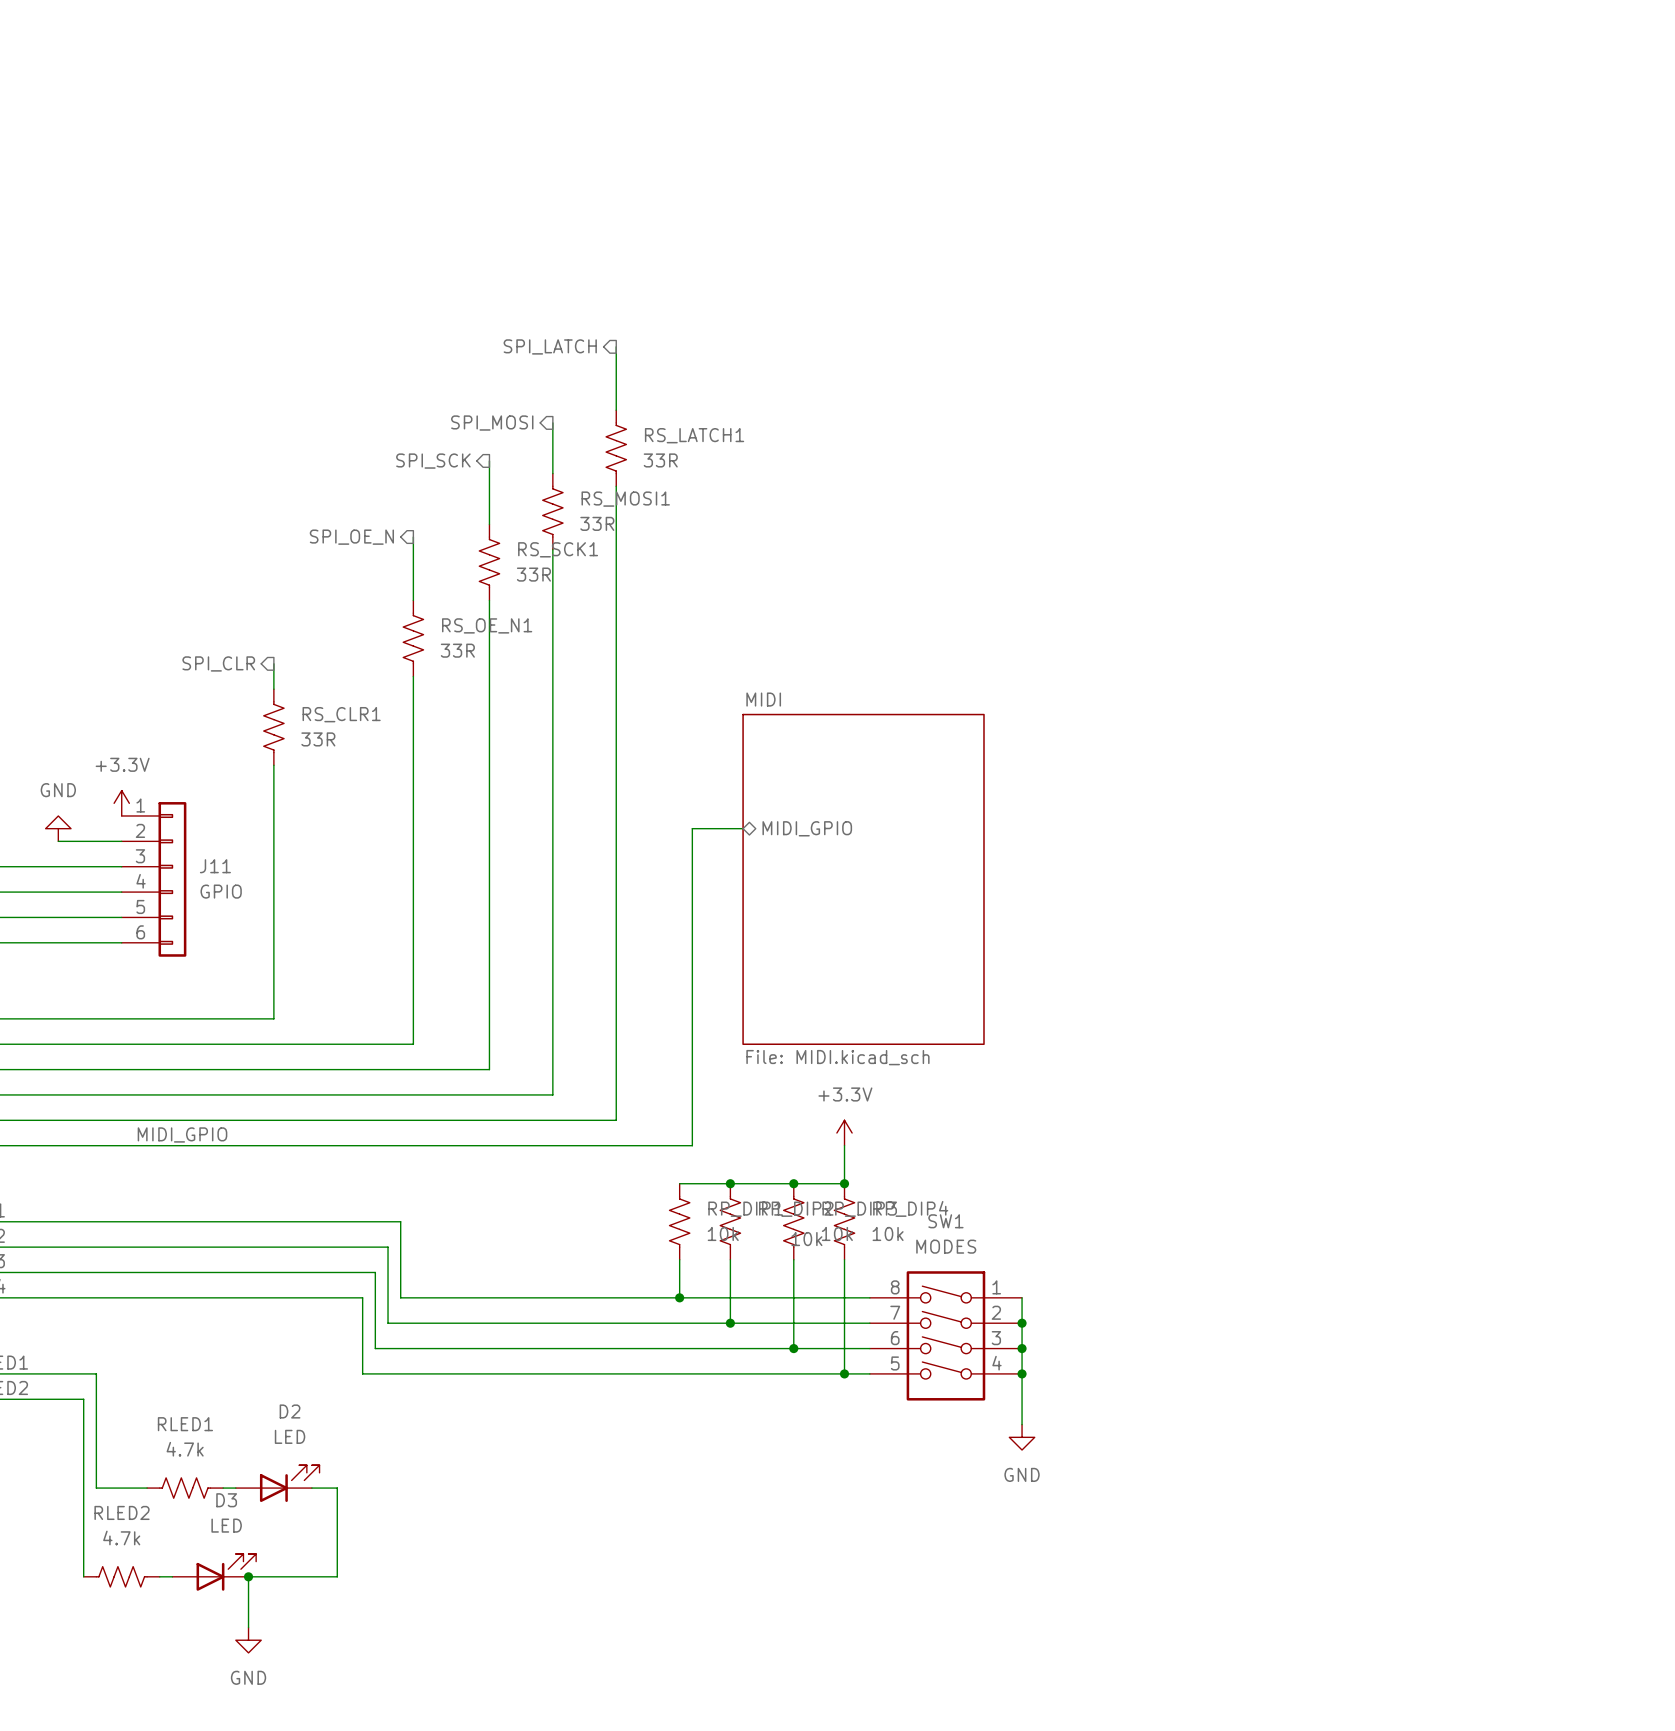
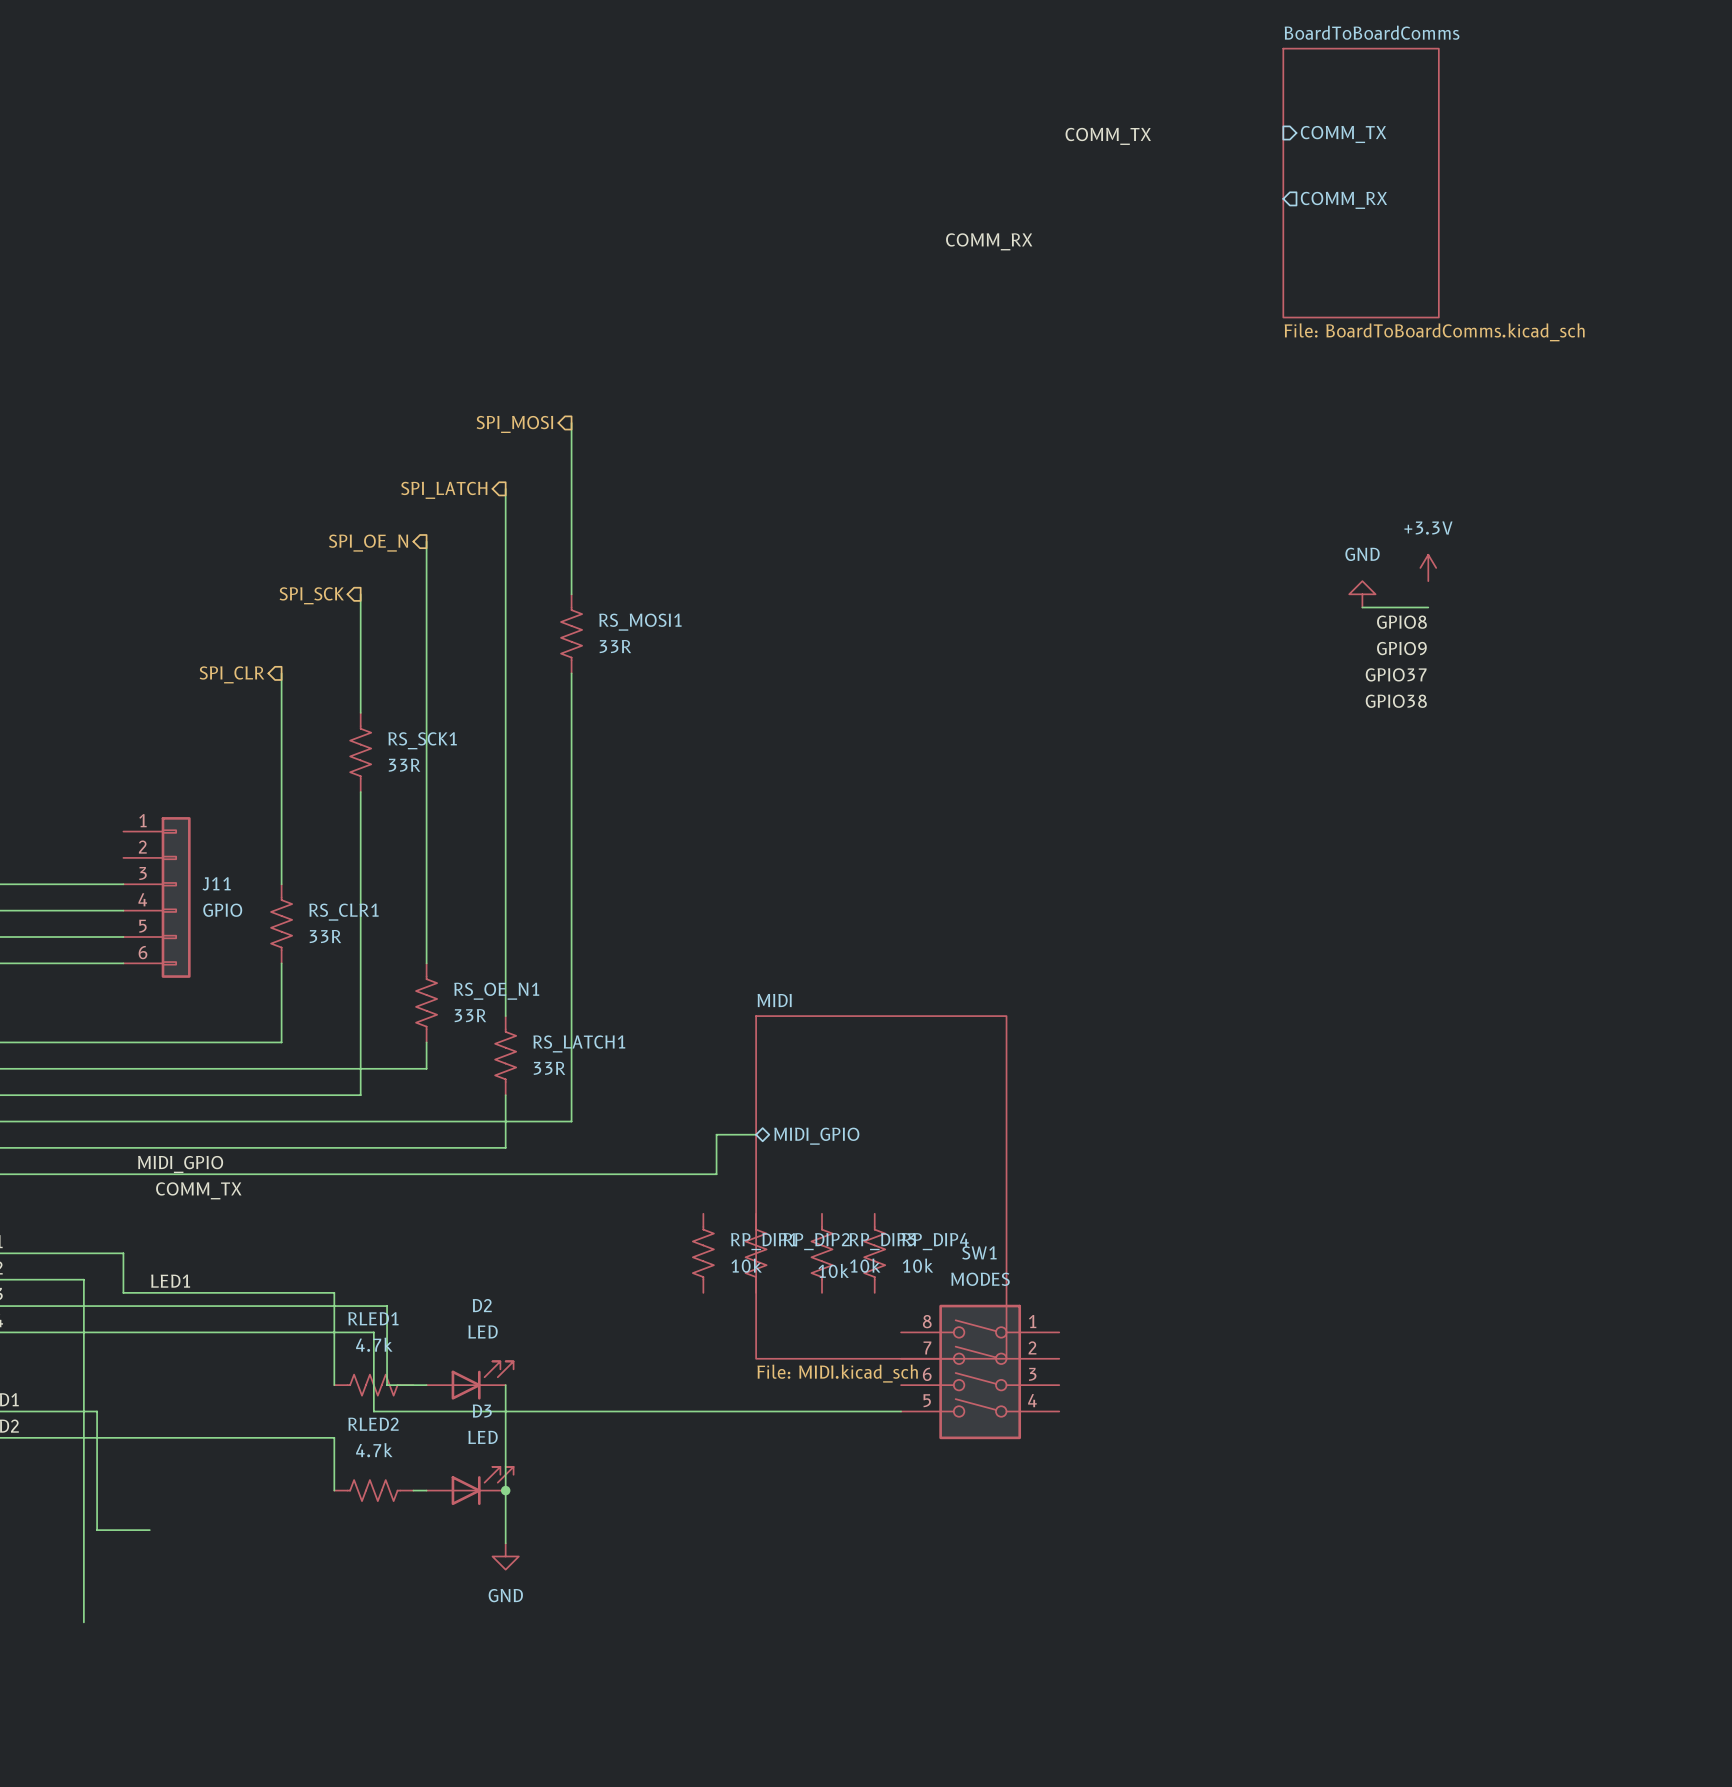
sheet pin: none -> COMM_TX (1343, 134)
label: none -> COMM_TX (1108, 136)
sheet BoardToBoardComms: none -> File: BoardToBoardComms.kicad_sch (1361, 183)
sheet pin: none -> COMM_RX (1343, 200)
label: none -> COMM_RX (989, 241)
hierarchical label position: SPI_LATCH (550, 346) -> SPI_LATCH (444, 490)
wire: (616, 346) (616, 410) -> none
RS_LATCH1 position: (616, 448) -> (505, 1055)
wire: (489, 460) (489, 486) -> none
hierarchical label position: SPI_SCK (433, 461) -> SPI_SCK (311, 595)
wire: (616, 486) (616, 1120) (489, 1120) -> (505, 1095) (505, 1147)
RS_MOSI1 position: (552, 511) -> (571, 633)
RS_SCK1 position: (489, 562) -> (360, 752)
power symbol: none -> +3.3V (1428, 567)
wire: none -> (360, 594) (360, 712)
power symbol: none -> GND (1362, 594)
wire: none -> (1362, 607) (1428, 607)
label: none -> GPIO8 (1401, 622)
RS_OE_N1 position: (413, 638) -> (426, 1002)
label: none -> GPIO9 (1401, 648)
label: none -> GPIO37 (1396, 674)
label: none -> GPIO38 (1396, 701)
RS_CLR1 position: (273, 727) -> (281, 923)
power symbol: +3.3V (121, 803) -> none
power symbol: GND (58, 828) -> none
wire: (743, 828) (692, 828) (692, 1107) -> (756, 1134) (716, 1134)
sheet pin: MIDI_GPIO (807, 828) -> none
wire: (58, 841) (121, 841) -> none
sheet MIDI: File: MIDI.kicad_sch (863, 879) -> none
wire: (489, 993) (489, 1069) (349, 1069) -> (360, 792) (360, 1095)
sheet pin: none -> MIDI_GPIO (816, 1136)
power symbol: +3.3V (844, 1133) -> none
wire: (844, 1145) (844, 1183) (679, 1183) -> none
sheet MIDI: none -> File: MIDI.kicad_sch (881, 1187)
label: none -> COMM_TX (198, 1190)
junction: (730, 1183) -> none
junction: (793, 1183) -> none
junction: (844, 1183) -> none
wire: (121, 1221) (400, 1221) (400, 1297) (869, 1297) -> (123, 1253) (123, 1292) (334, 1292) (334, 1385)
wire: (83, 1247) (388, 1247) (388, 1323) (869, 1323) -> (83, 1279) (83, 1437) (334, 1437) (334, 1490)
label: none -> LED1 (170, 1281)
wire: (679, 1259) (679, 1297) -> none
wire: (793, 1259) (793, 1348) -> none
wire: (844, 1259) (844, 1373) -> none
junction: (679, 1297) -> none
wire: (1022, 1297) (1022, 1424) -> none
junction: (730, 1323) -> none
junction: (1022, 1323) -> none
wire: (413, 1348) (869, 1348) -> none
wire: none -> (505, 1385) (505, 1543)
junction: (793, 1348) -> none
junction: (1022, 1348) -> none
junction: (844, 1373) -> none
junction: (1022, 1373) -> none
power symbol: GND (1022, 1437) -> none
junction: none -> (505, 1490)
D2 position: (277, 1483) -> (470, 1380)
RLED1 position: (185, 1488) -> (373, 1385)
wire: (223, 1488) (235, 1488) -> (413, 1490) (426, 1490)
wire: (311, 1488) (337, 1488) (337, 1576) (248, 1576) (248, 1627) -> none
power symbol: none -> GND (505, 1556)
D3 position: (214, 1572) -> (470, 1485)
RLED2 position: (121, 1576) -> (373, 1490)
wire: (159, 1576) (172, 1576) -> none
junction: (248, 1576) -> none
power symbol: GND (248, 1640) -> none

